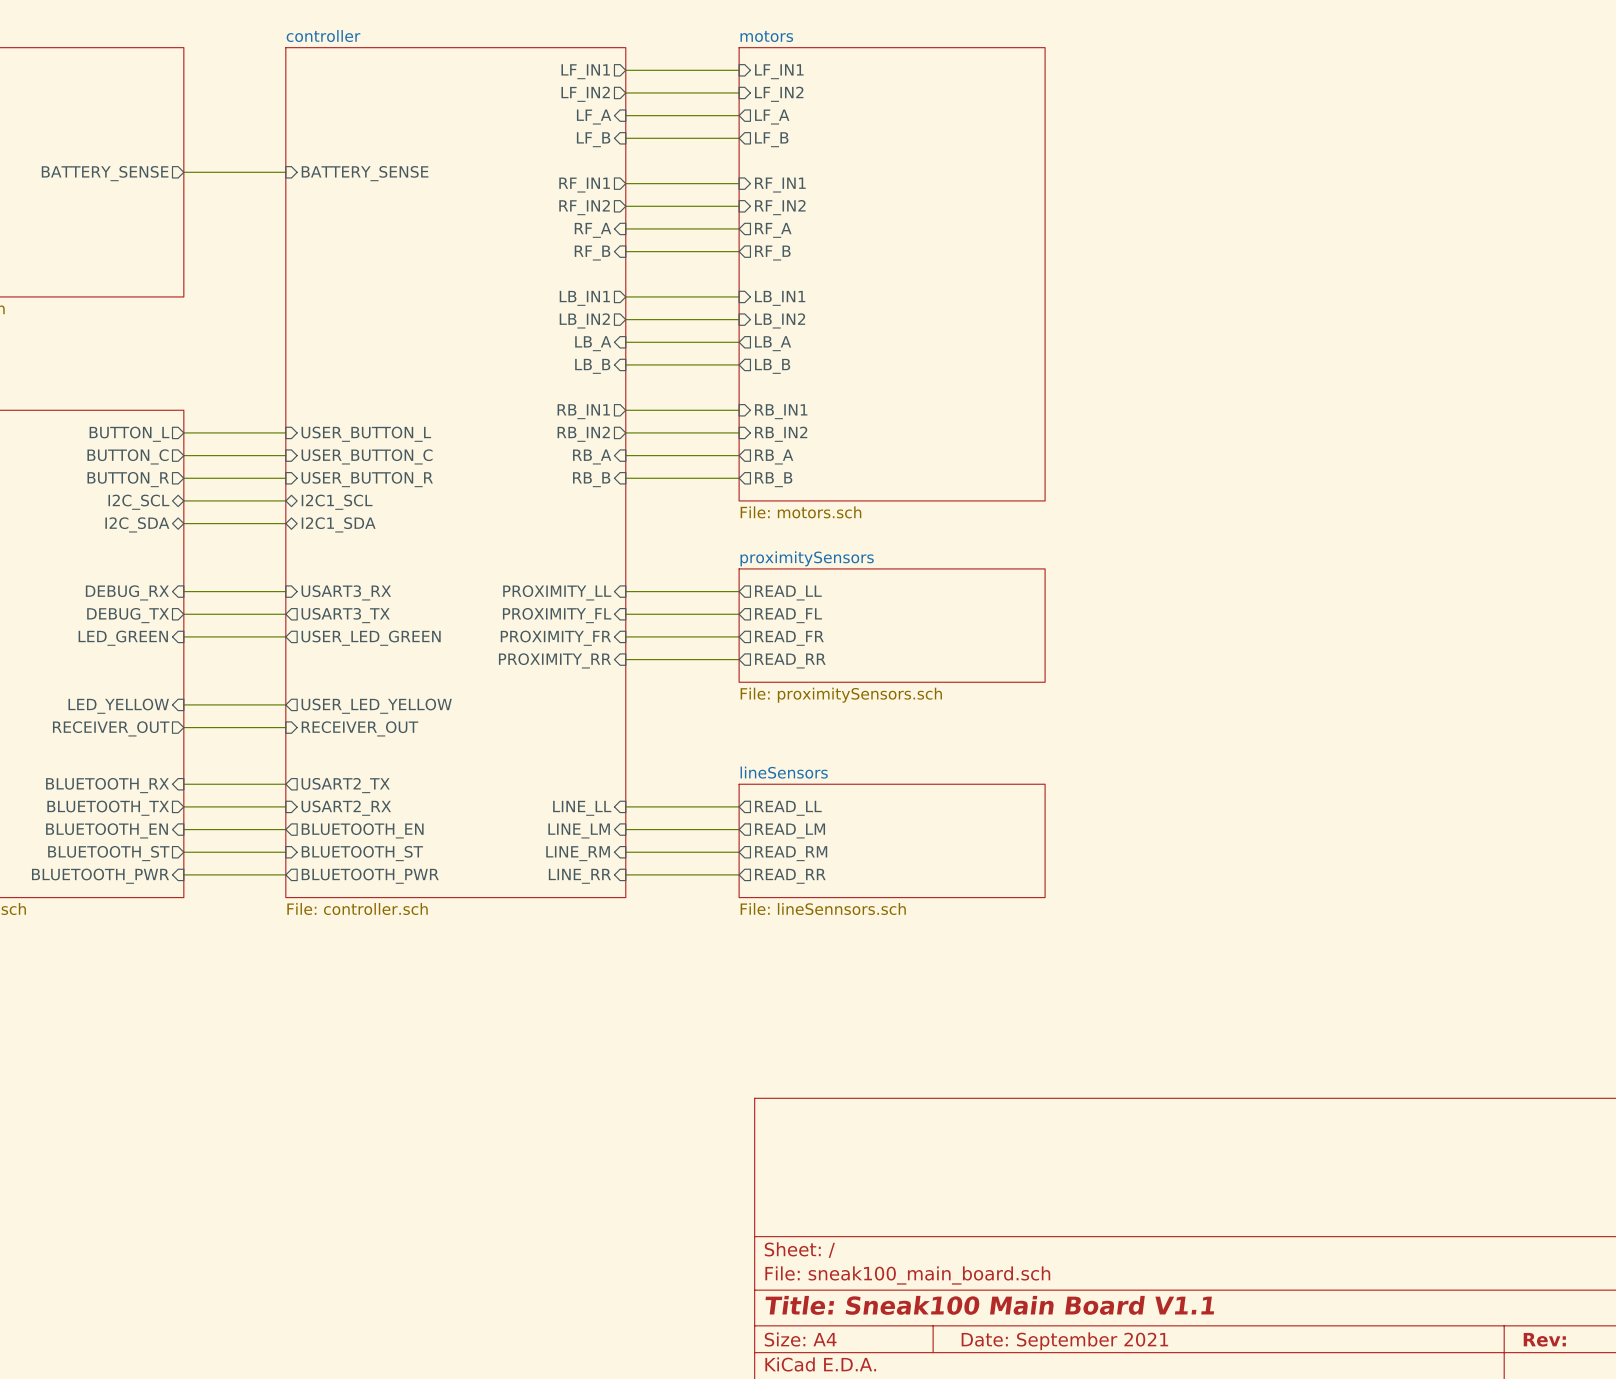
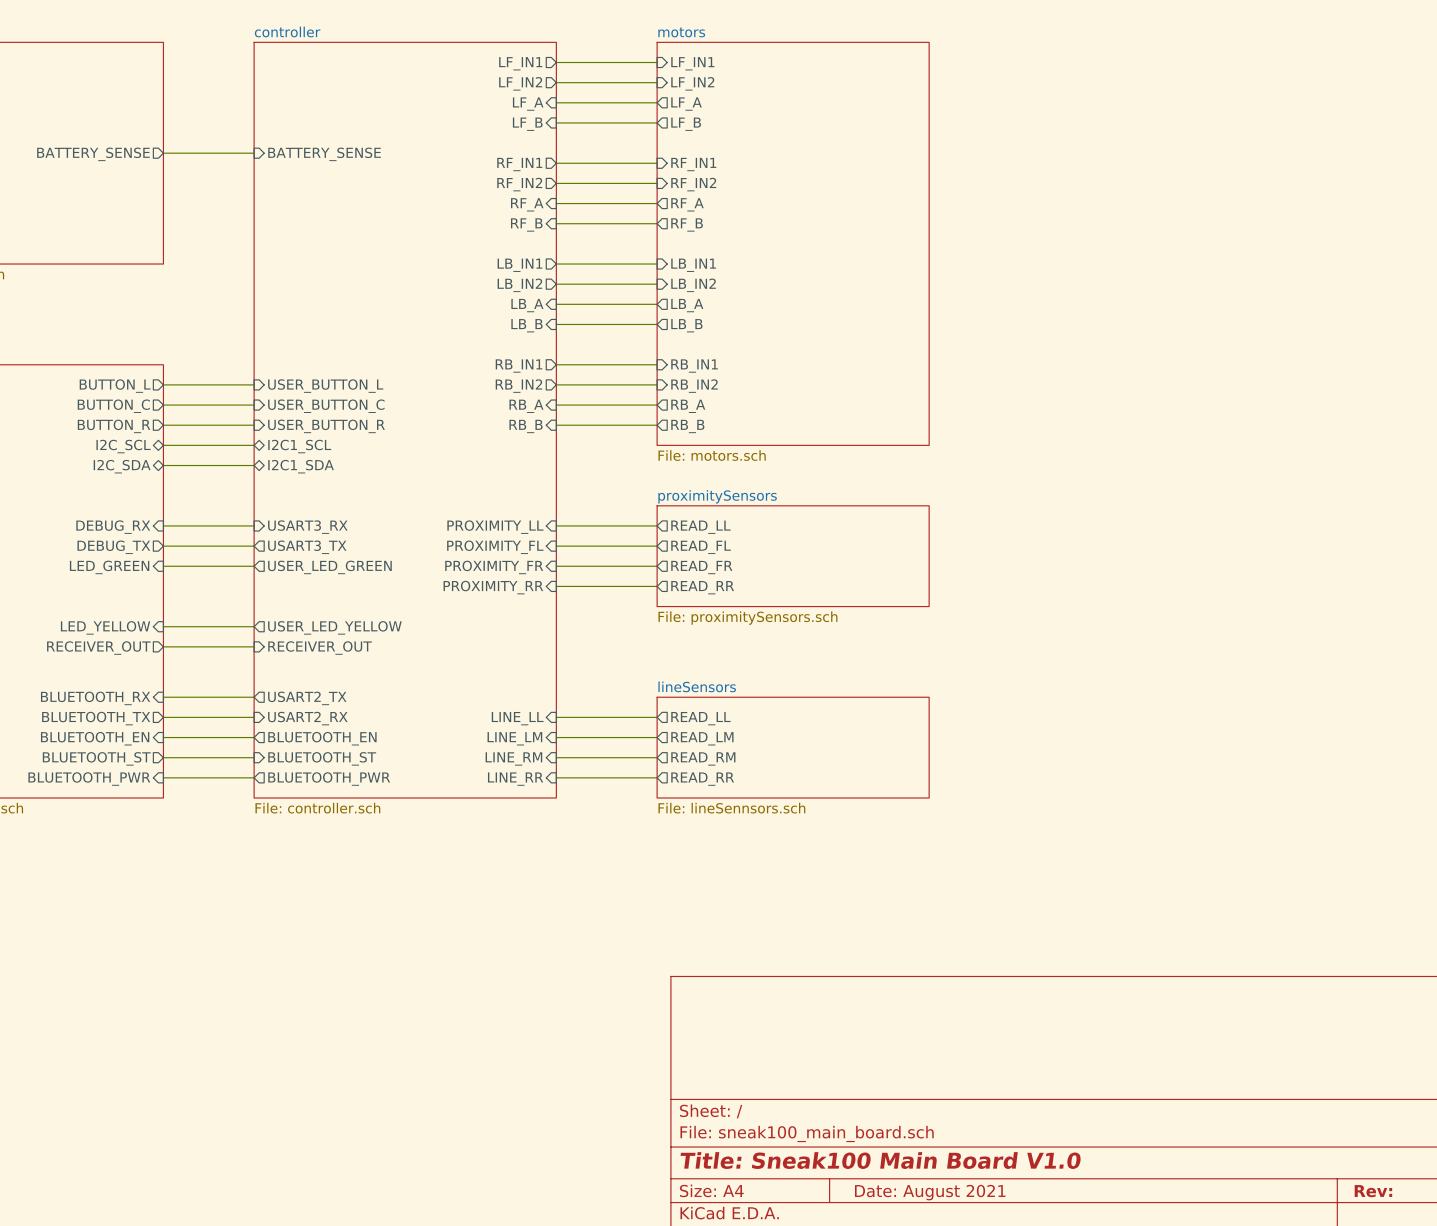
title block: Title: Sneak100 Main Board V1.1 (989, 1305) -> Title: Sneak100 Main Board V1.0 (880, 1160)
title block: Date: September 2021 (1064, 1341) -> Date: August 2021 (930, 1192)

